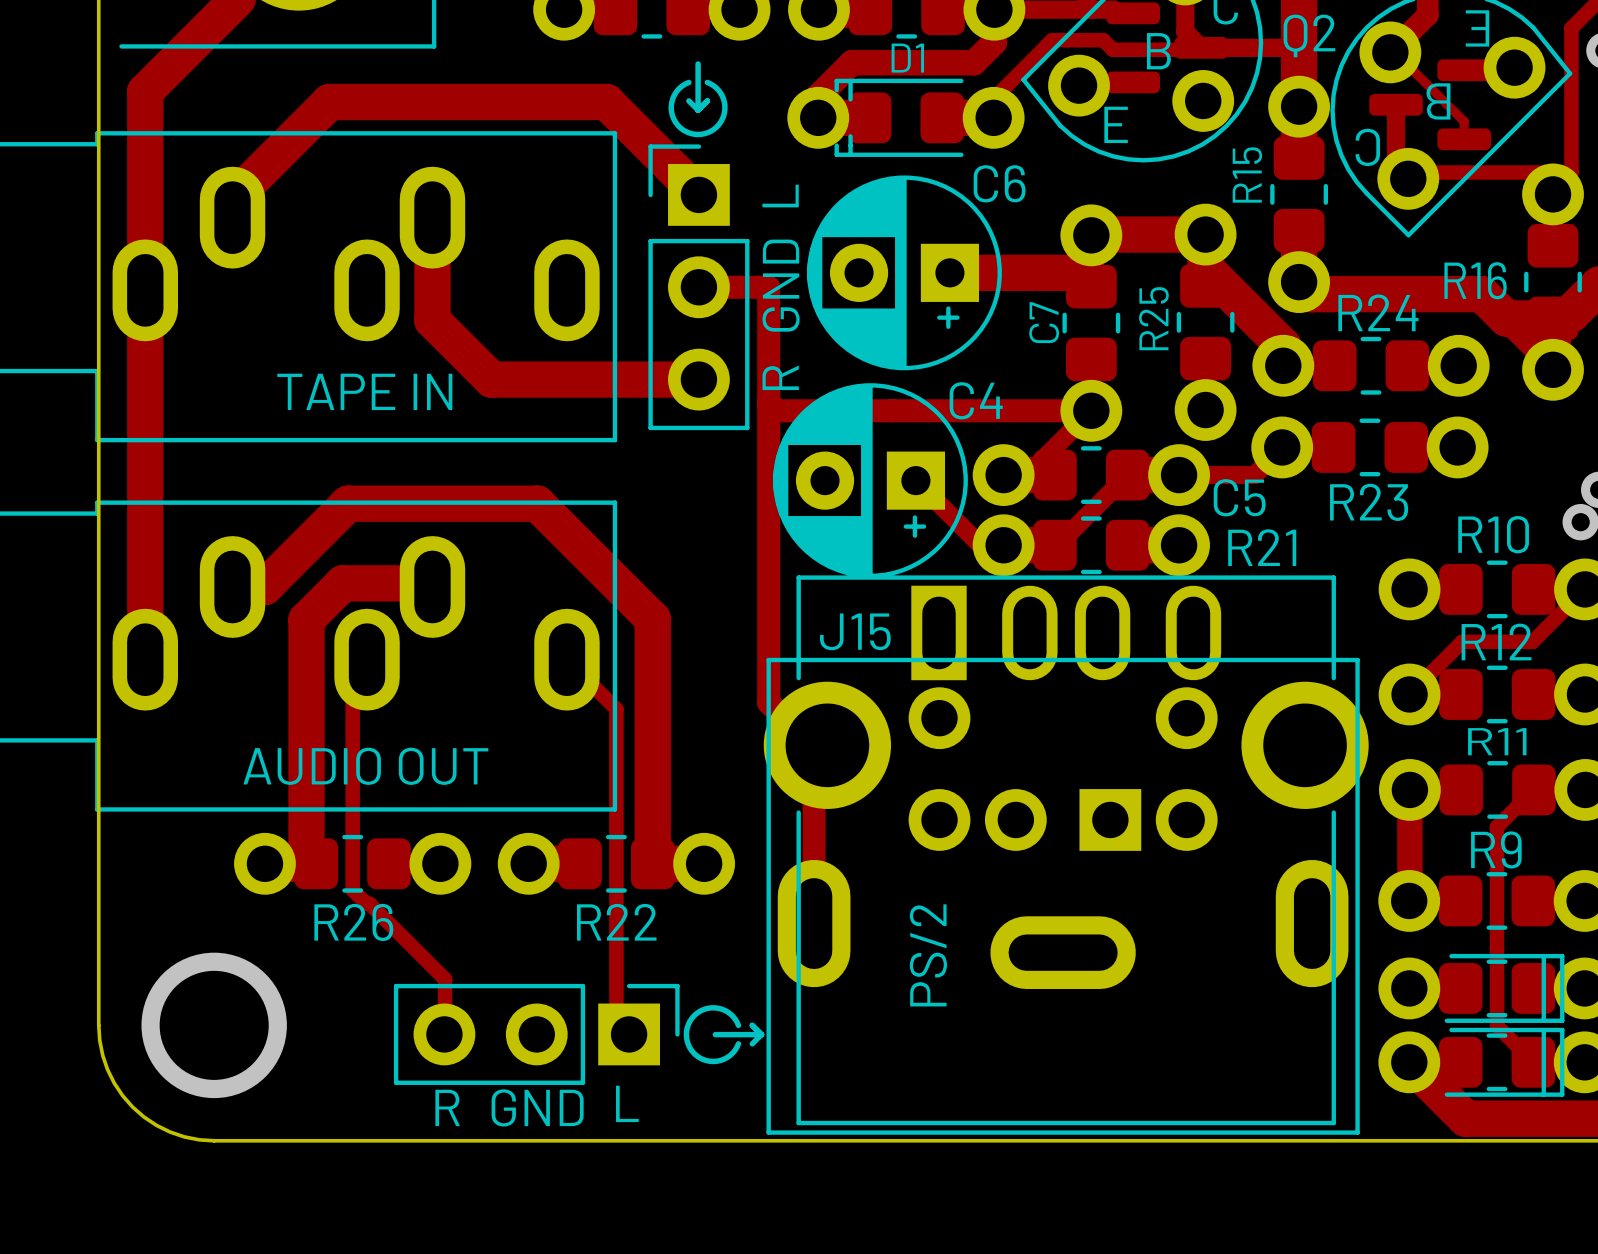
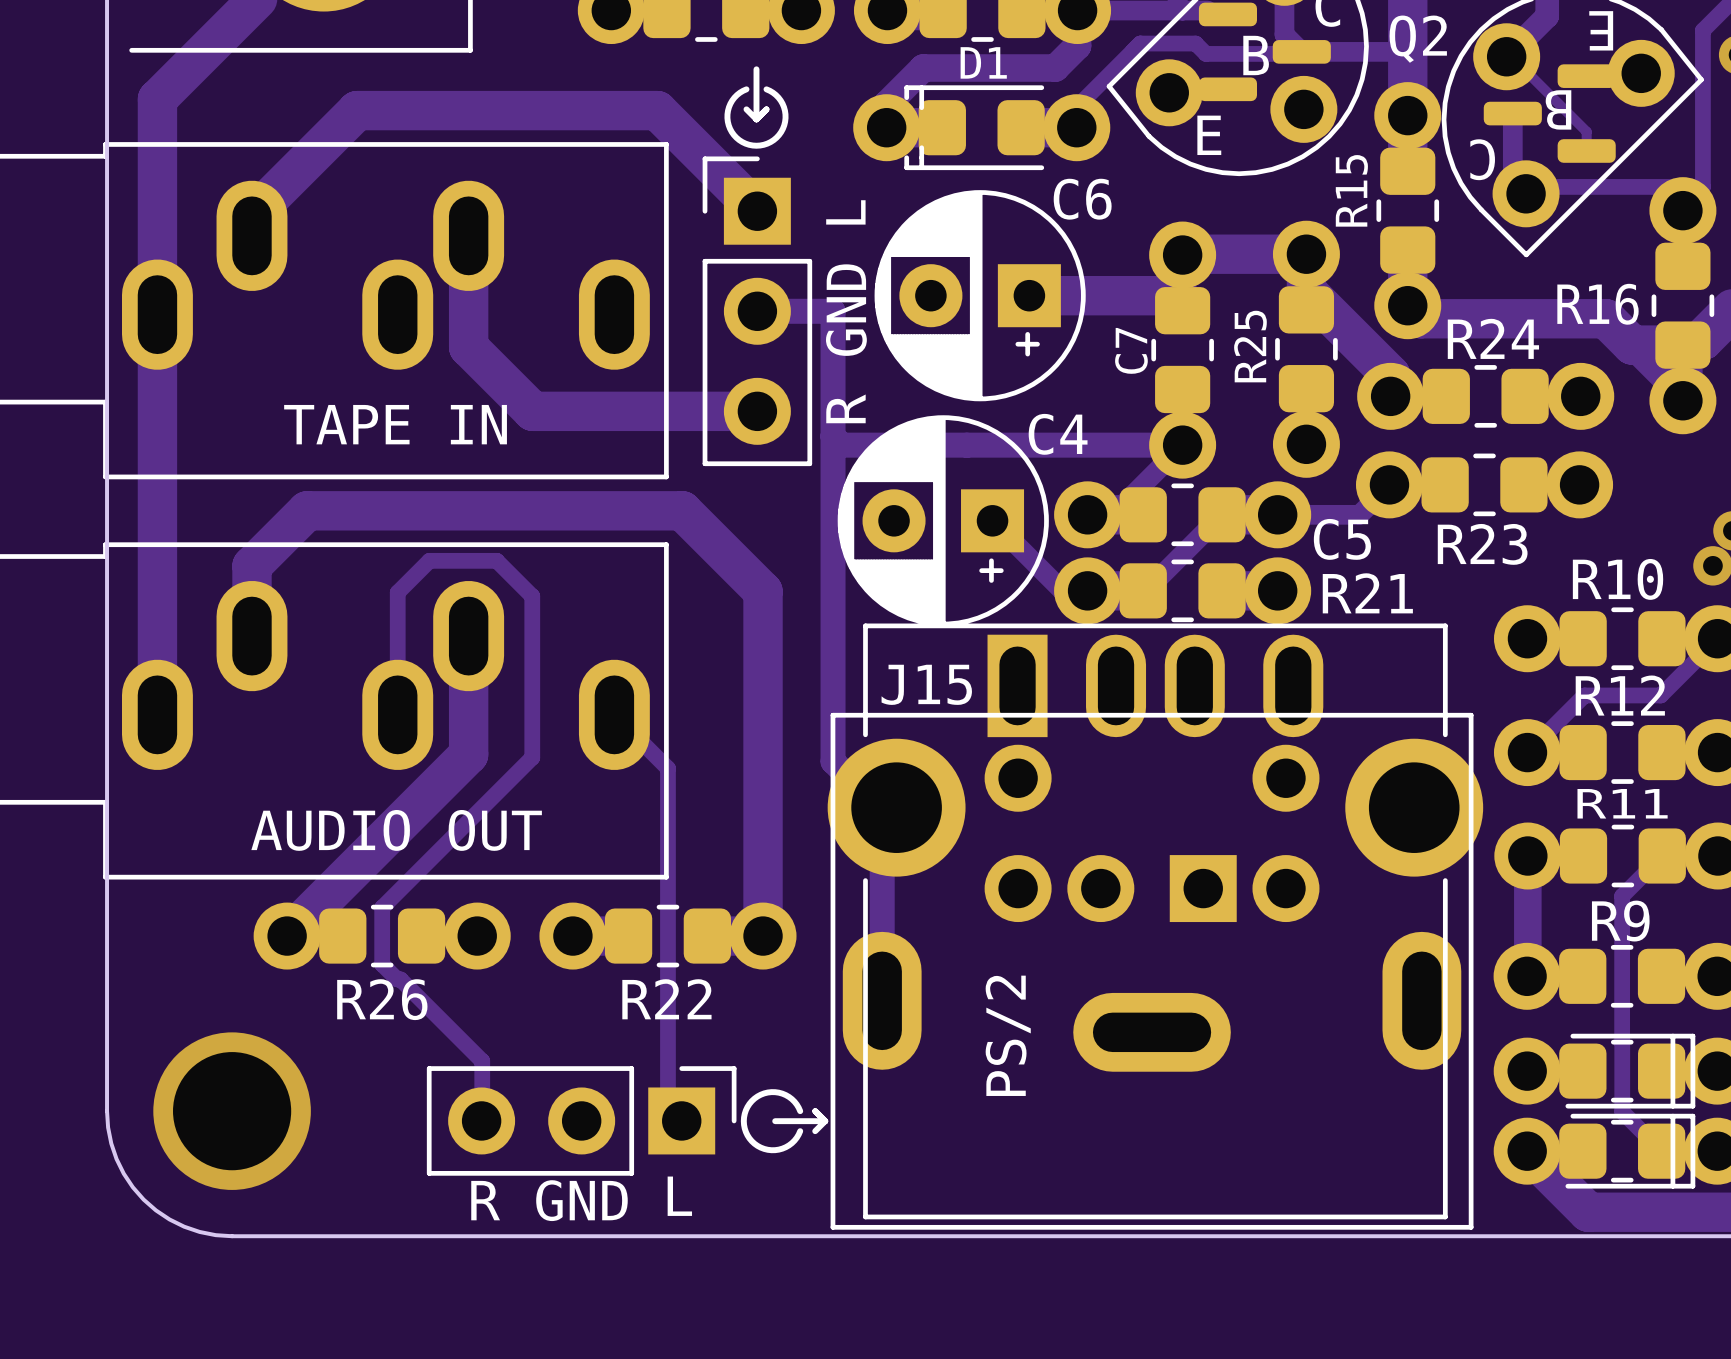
track: (232, 586) (264, 586) (348, 503) (537, 503) (652, 619) (652, 863) -> (251, 636) (251, 565) (307, 510) (682, 510) (763, 591) (763, 936)
track: (432, 586) (428, 583) (342, 583) (306, 619) (306, 853) (316, 863) (264, 863) -> (468, 661) (468, 754) (287, 936)
track: (367, 659) (352, 674) (352, 837) -> (397, 714) (397, 592) (429, 560) (496, 560) (532, 596) (532, 757) (382, 907)

